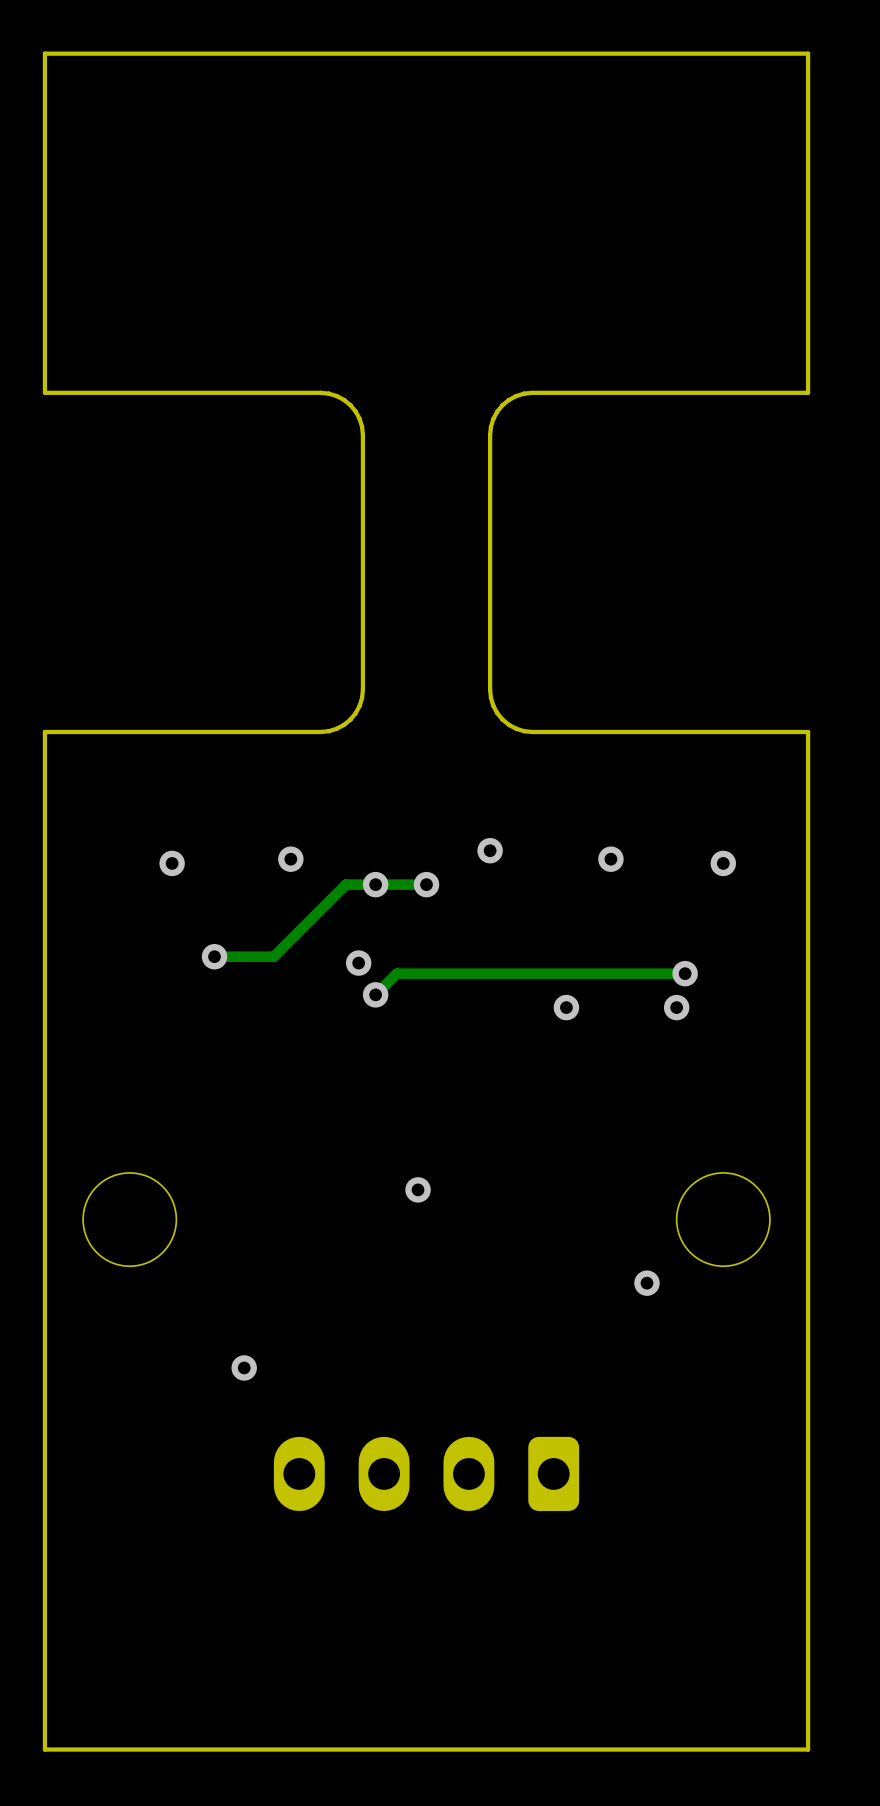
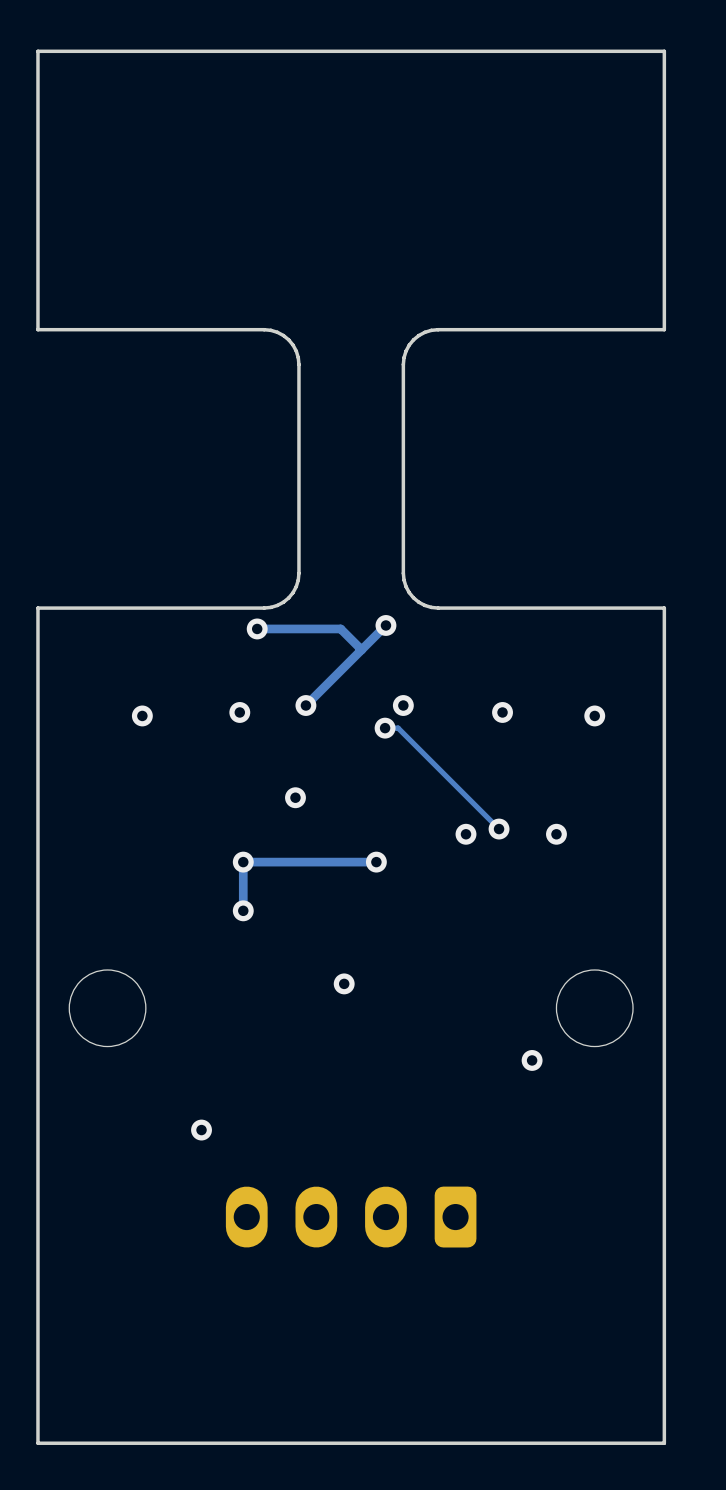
track: none -> (385, 625) (305, 705)
via: none -> (385, 625)
track: none -> (257, 628) (340, 628) (361, 649)
via: none -> (257, 628)
via: none -> (305, 705)
track: none -> (385, 728) (398, 728) (499, 829)
via: none -> (385, 728)
via: (375, 884) -> none
track: (426, 884) (345, 884) (273, 956) (214, 956) -> none
via: (426, 884) -> none
via: (214, 956) -> none
track: (685, 973) (396, 973) (375, 994) -> none
via position: (685, 973) -> (499, 829)
via: (375, 994) -> none
via: none -> (243, 862)
track: none -> (376, 862) (243, 862) (243, 910)
via: none -> (376, 862)
via: none -> (243, 910)

